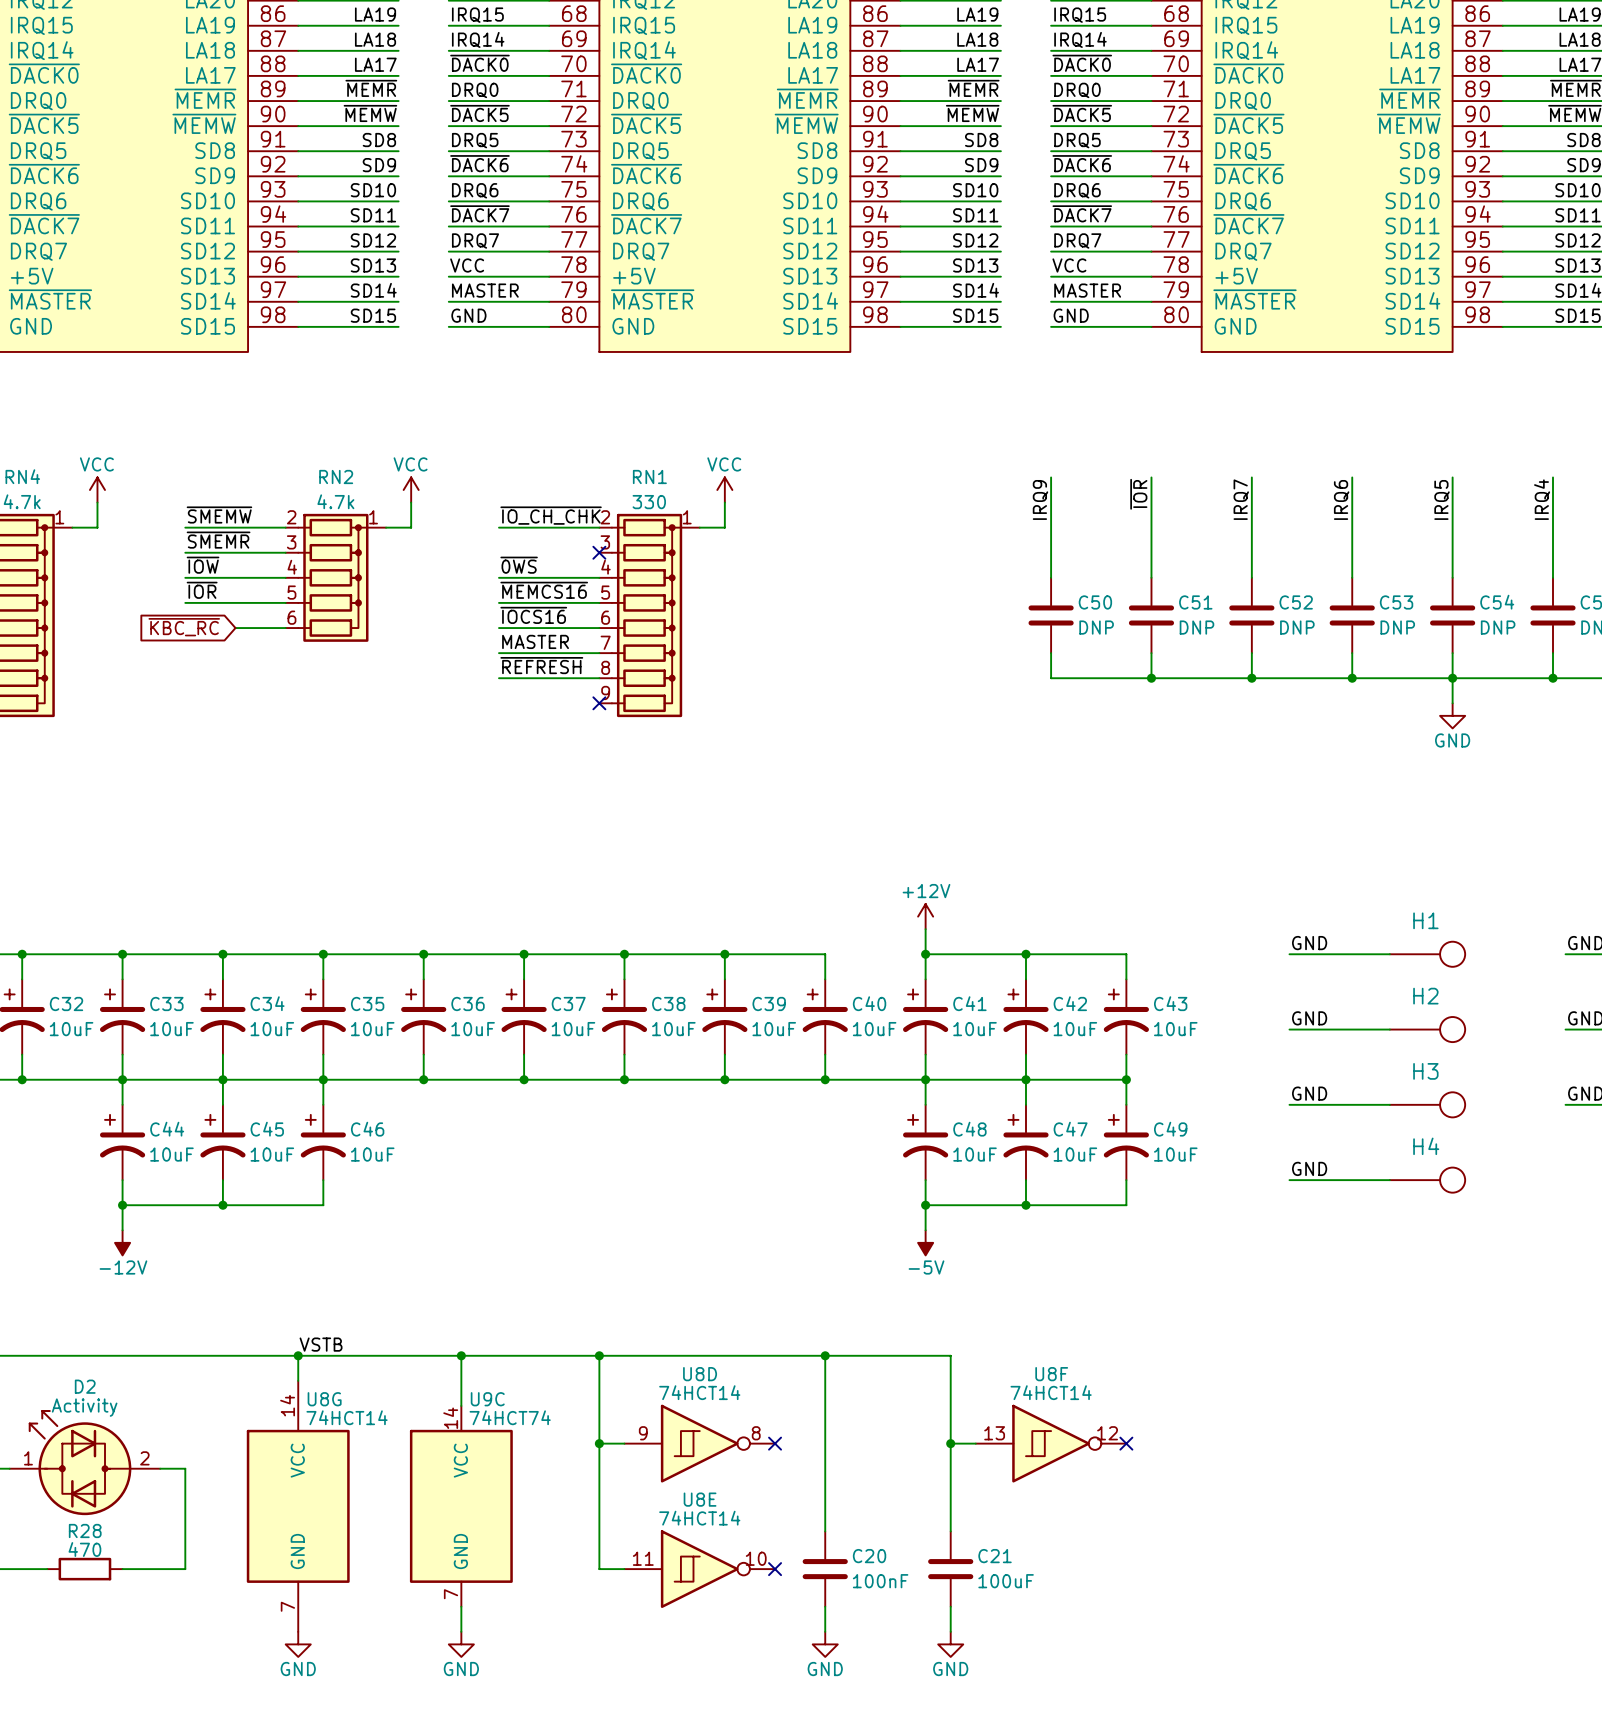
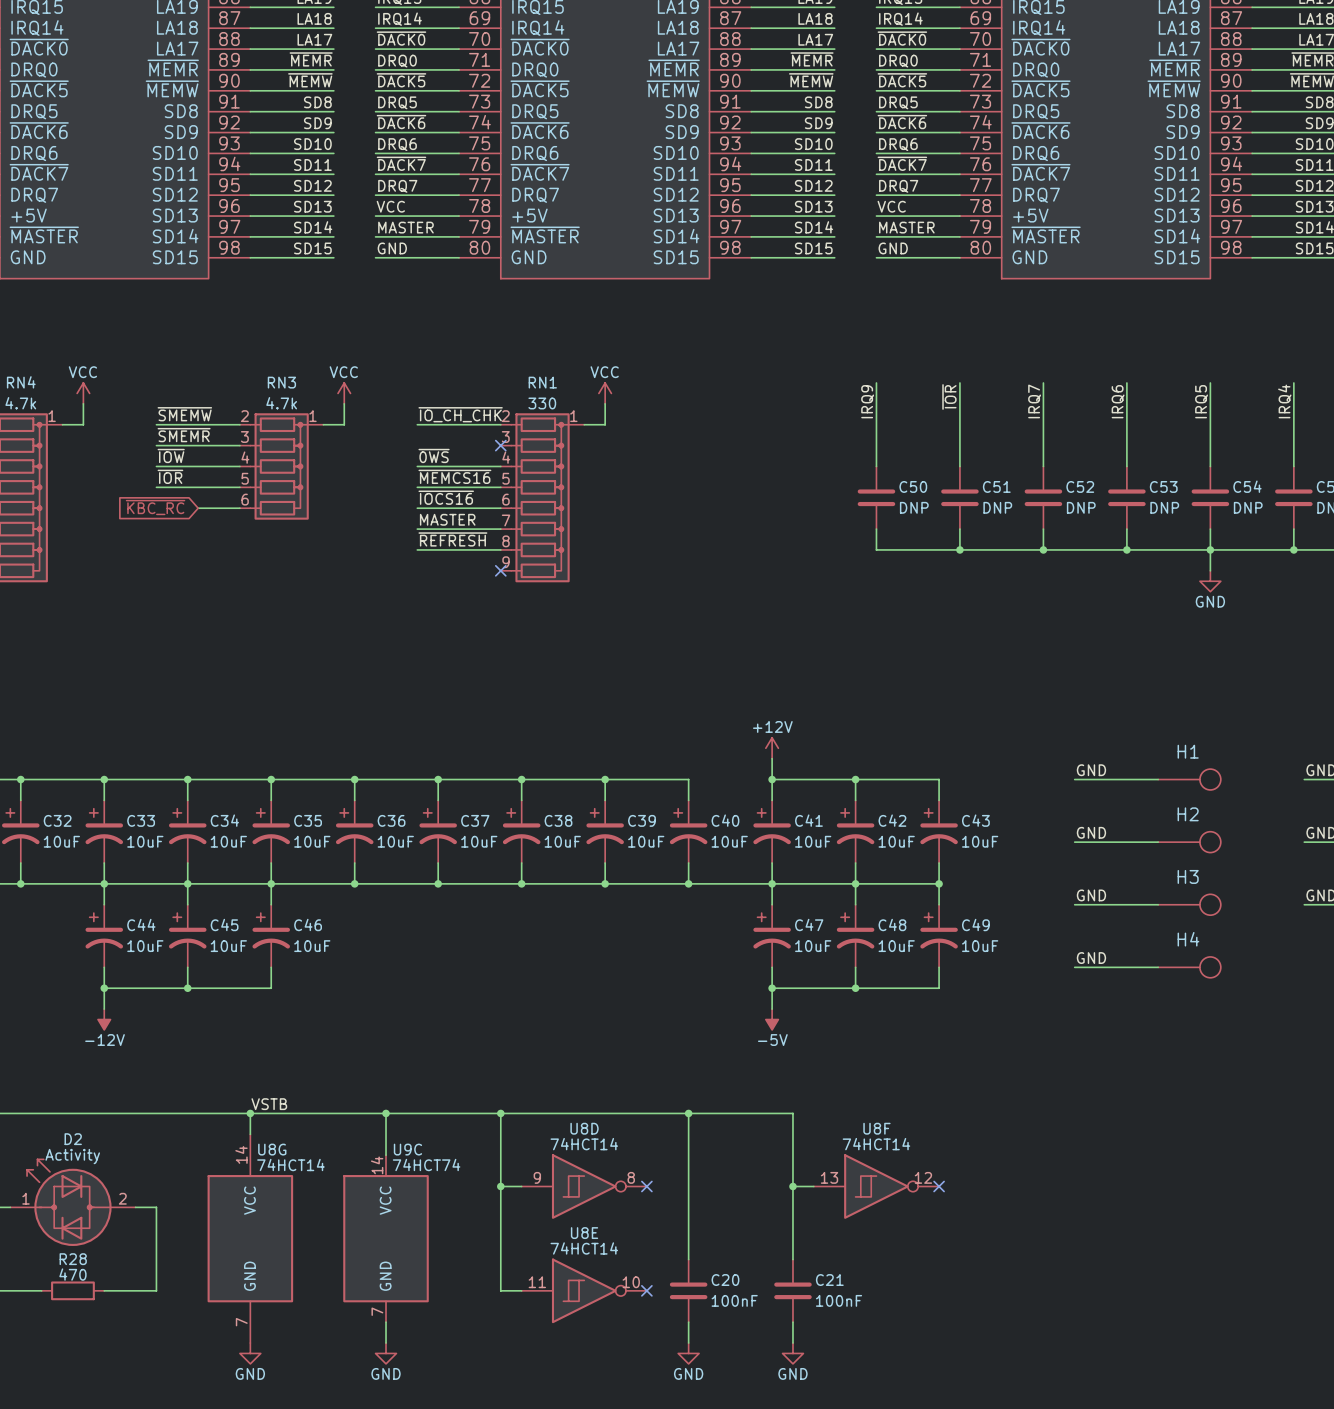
RN2 name: RN2 (336, 476) -> RN3 (281, 382)
C48 name: C48 (969, 1129) -> C47 (809, 924)
C47 name: C47 (1070, 1129) -> C48 (892, 924)
C21 value: 100uF (1006, 1581) -> 100nF (839, 1300)

